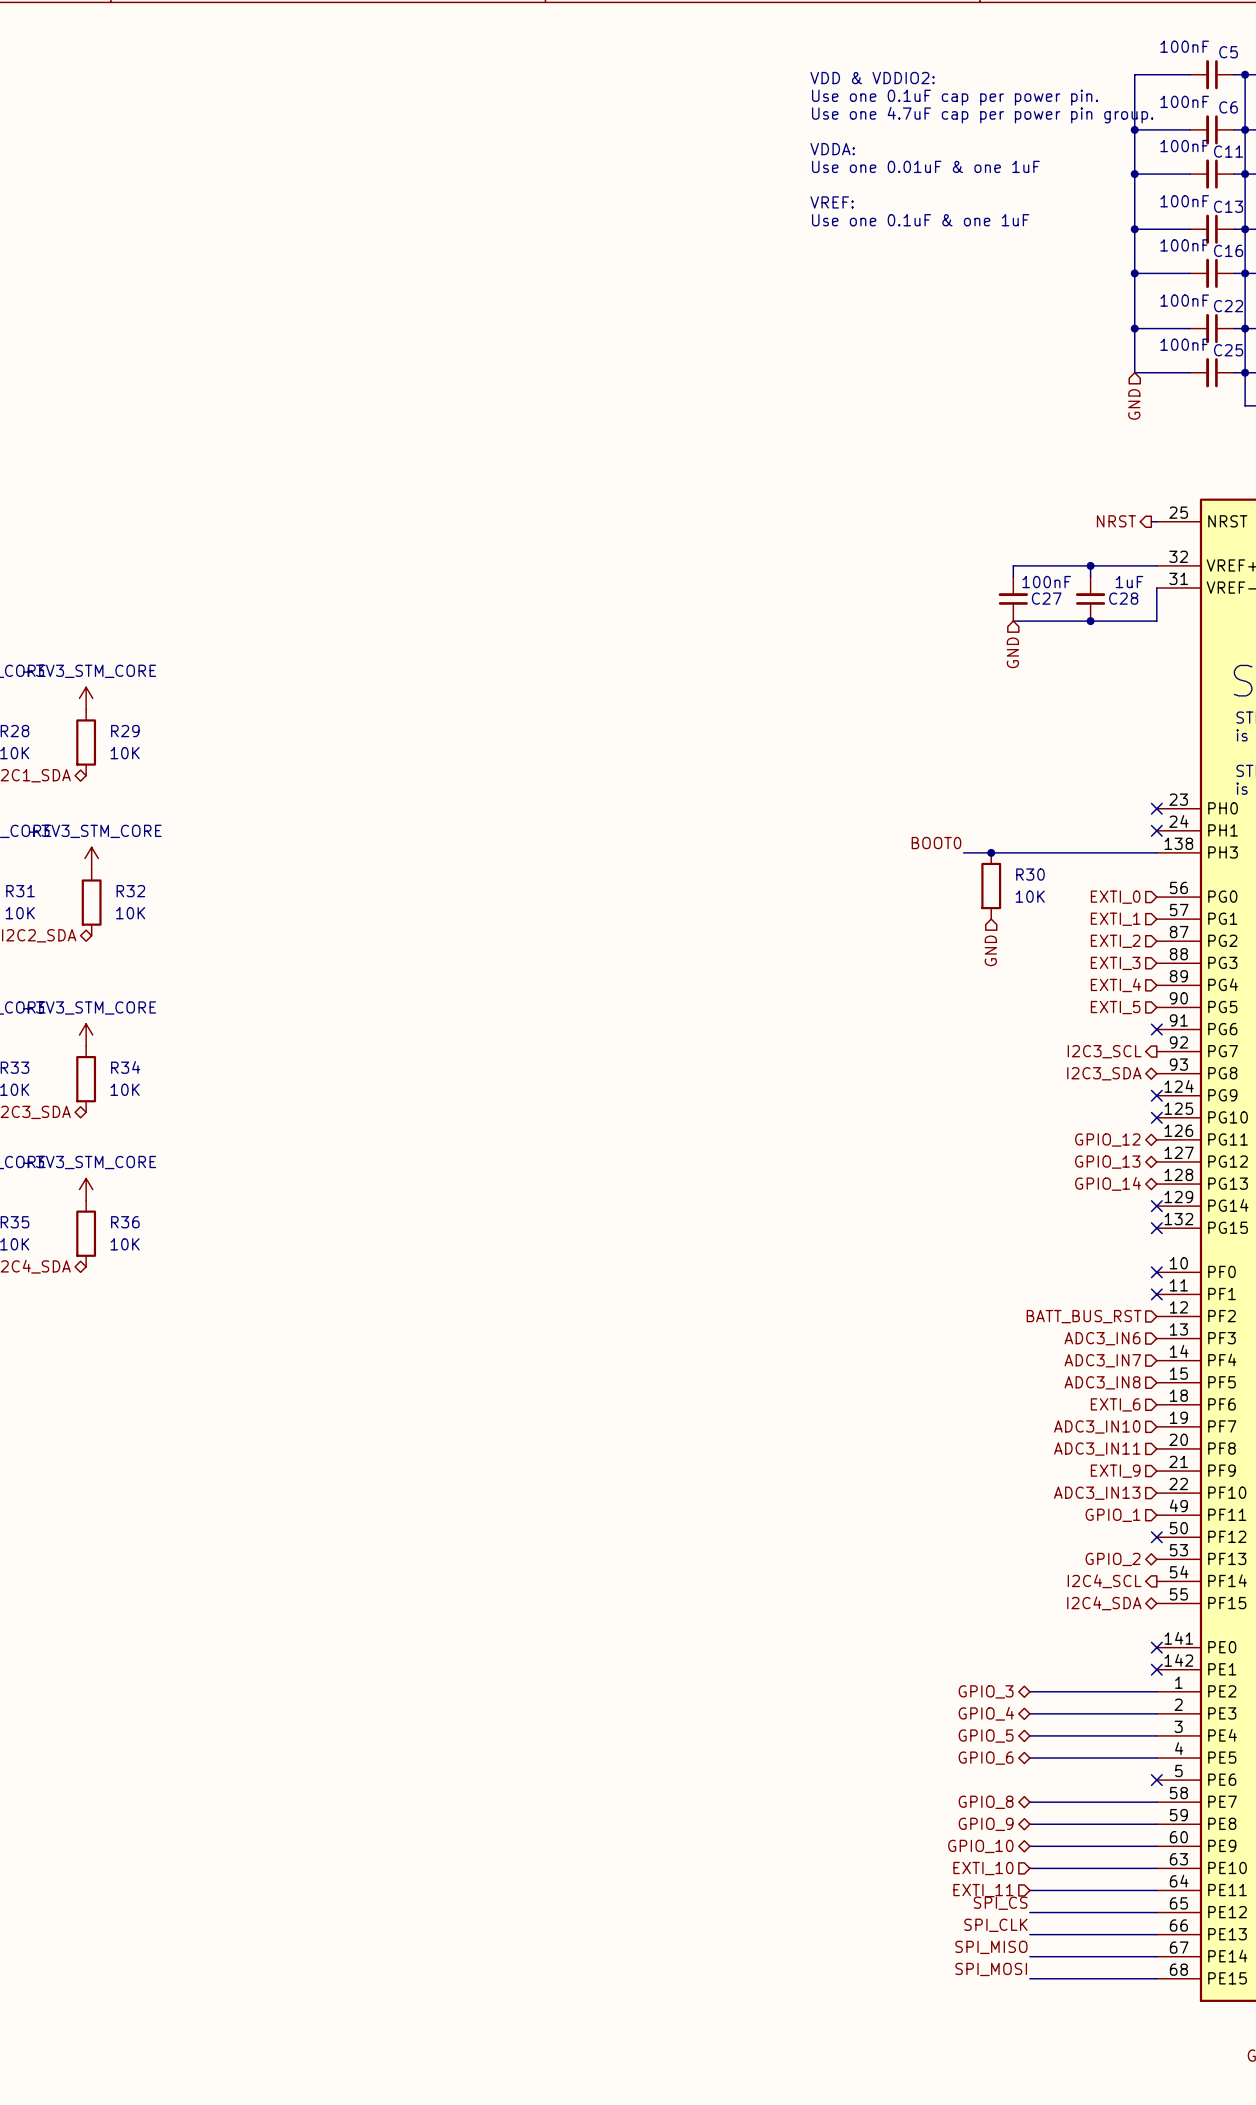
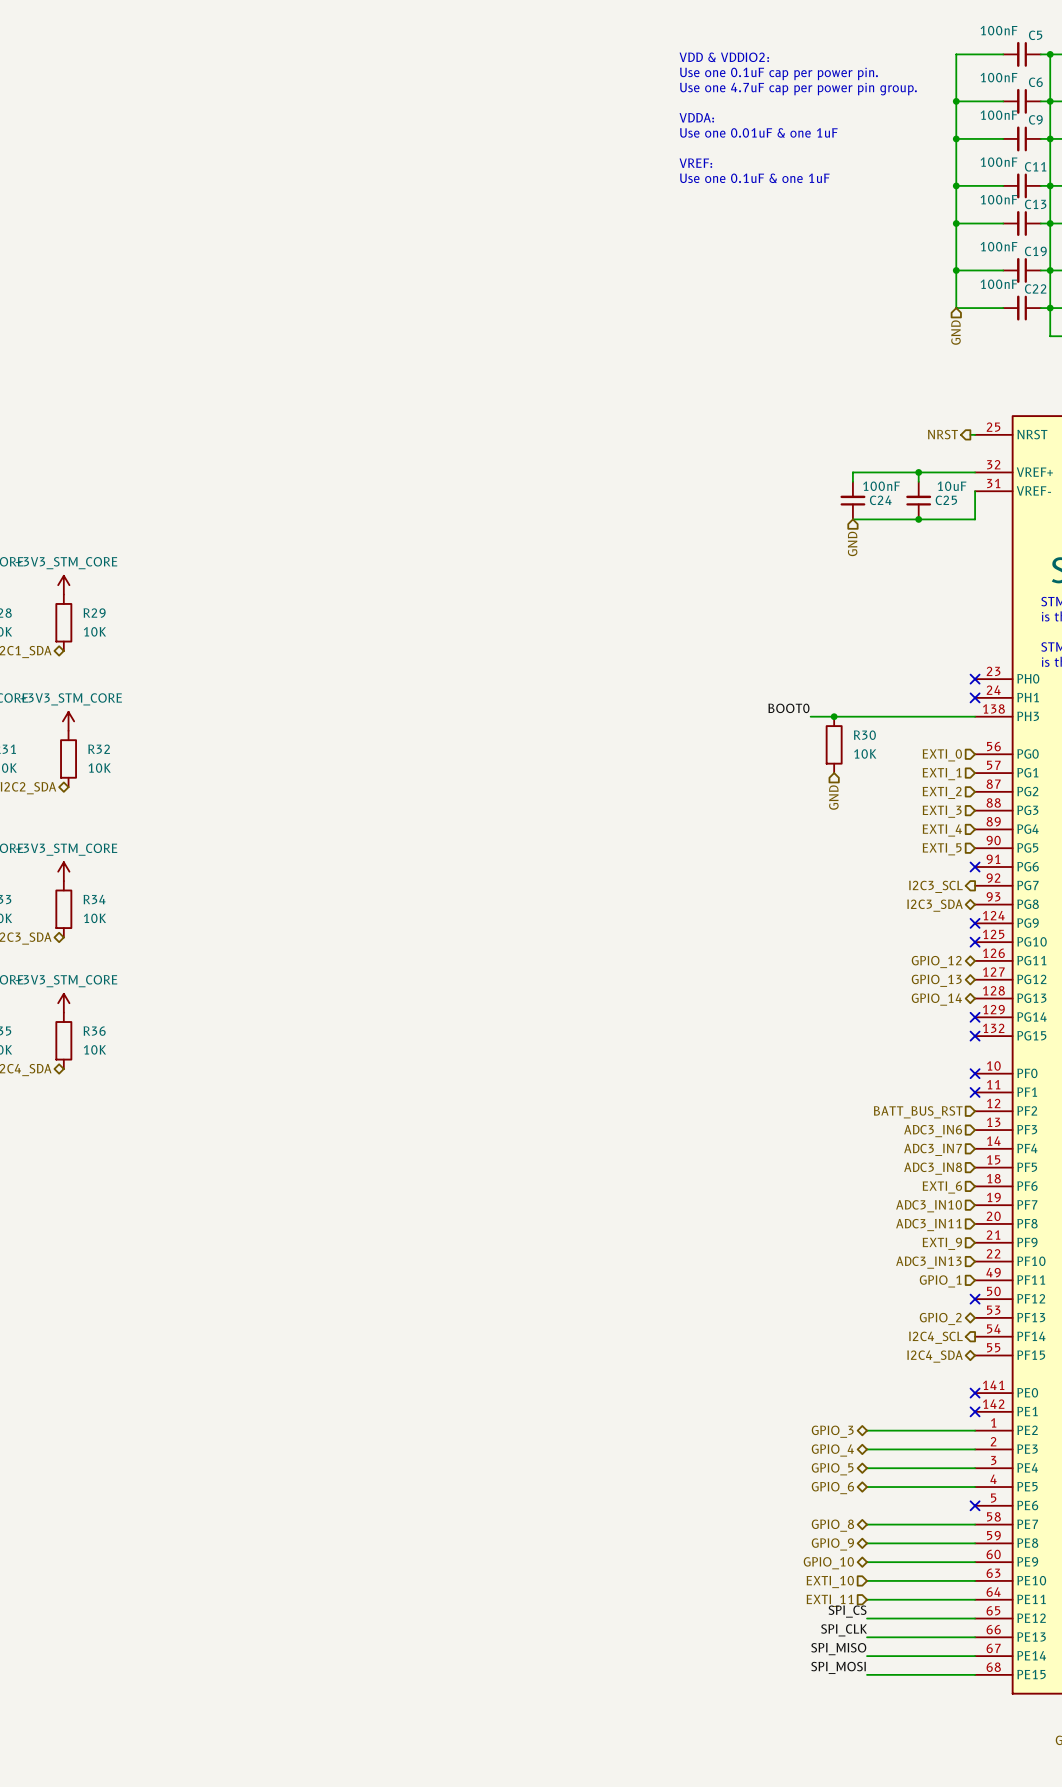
C11 name: C11 (1228, 151) -> C9 (1035, 119)
C13 name: C13 (1228, 206) -> C11 (1035, 166)
C16 name: C16 (1228, 250) -> C13 (1035, 204)
C22 name: C22 (1228, 306) -> C19 (1035, 251)
C25 name: C25 (1228, 350) -> C22 (1035, 288)
C28 value: 1uF (1129, 582) -> 10uF (952, 486)
C27 name: C27 (1046, 598) -> C24 (880, 500)
C28 name: C28 (1123, 598) -> C25 (946, 500)

